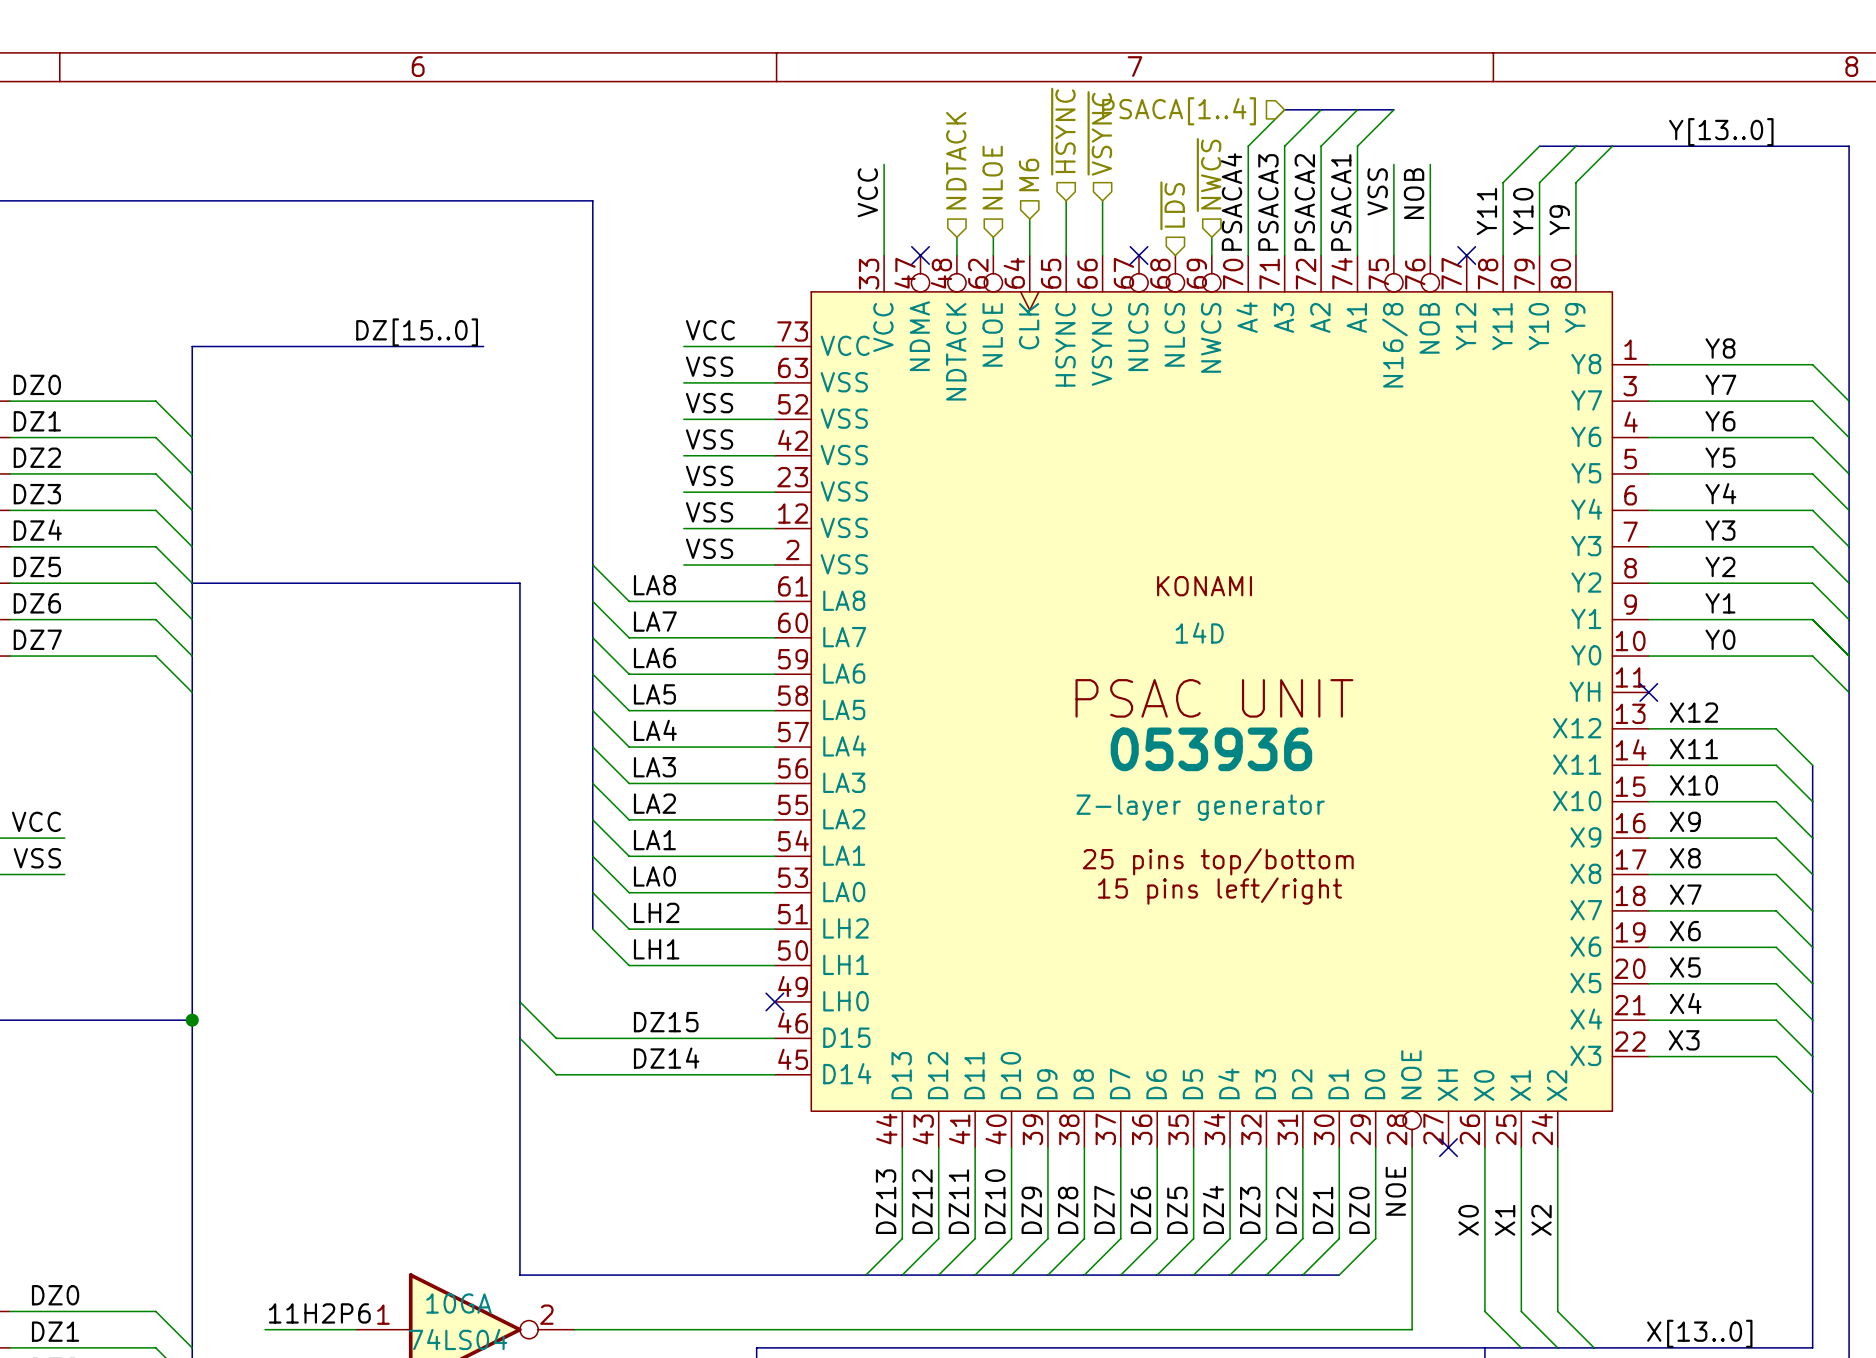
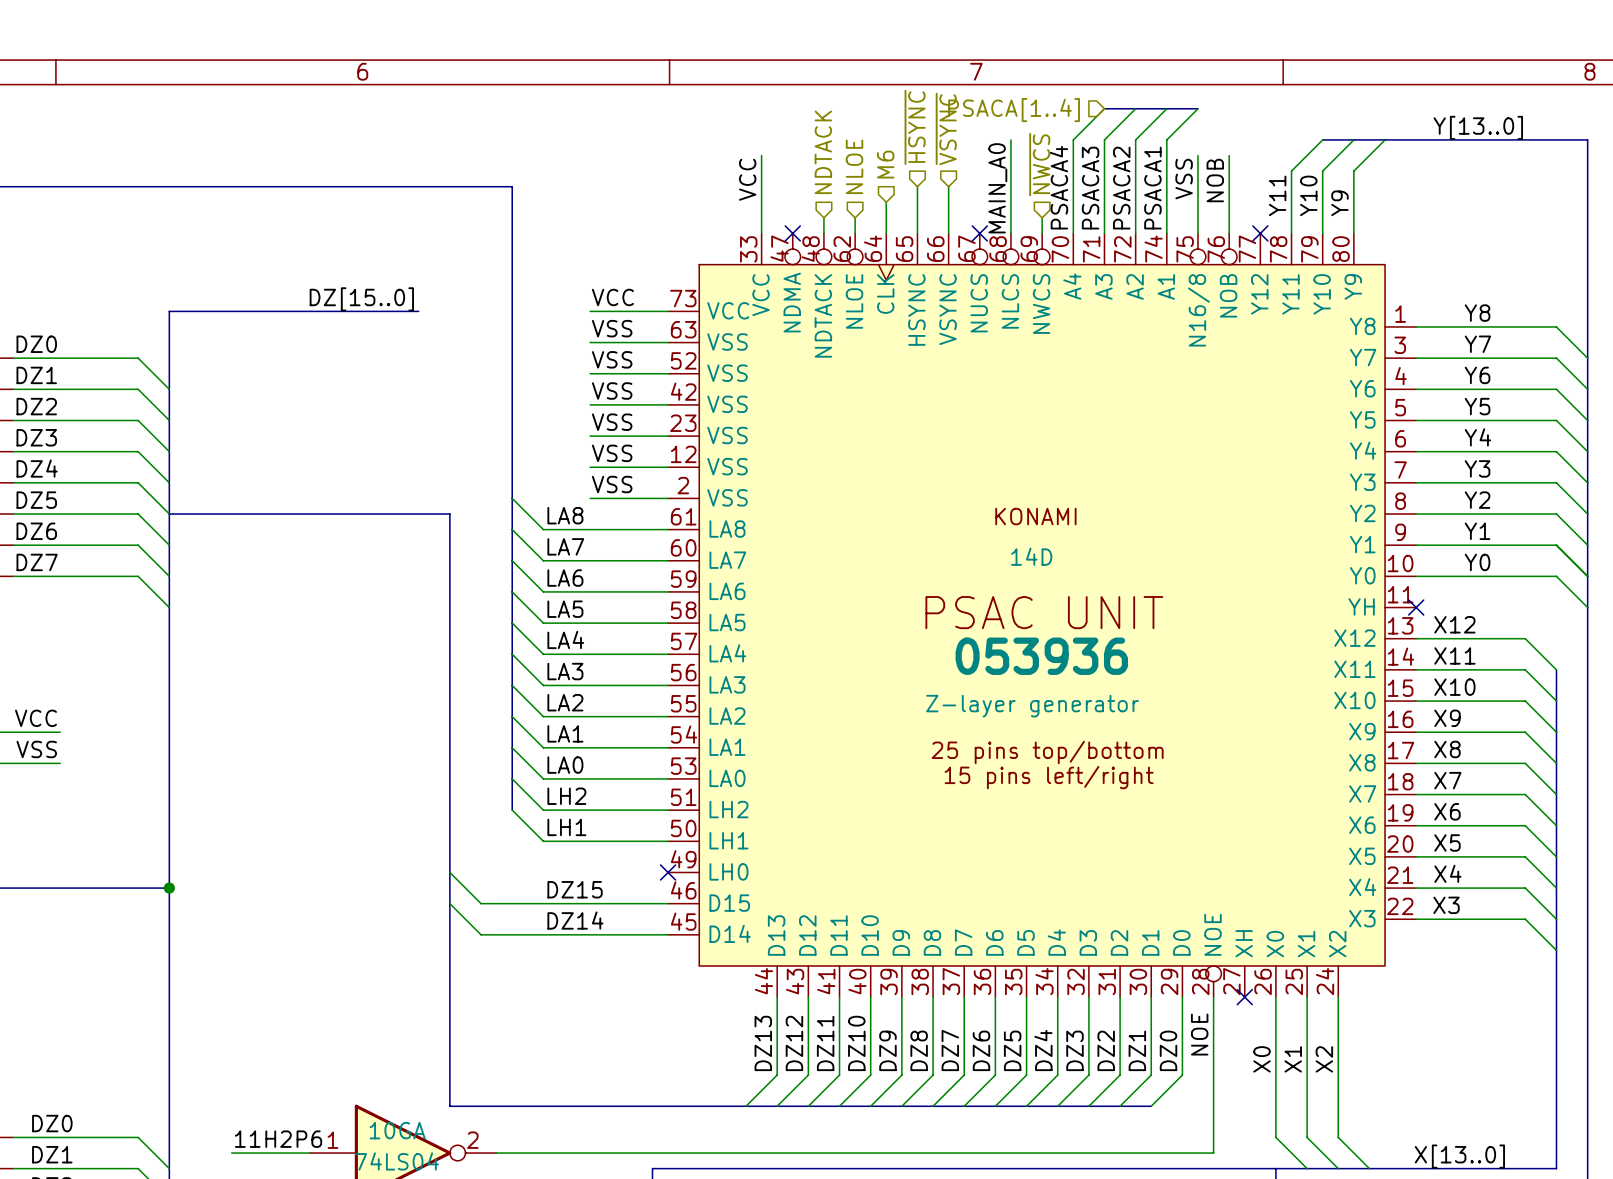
wire: none -> (1010, 139) (1010, 233)
label: none -> MAIN_A0 (997, 188)
hierarchical label: ~{LDS} (1172, 205) -> none

